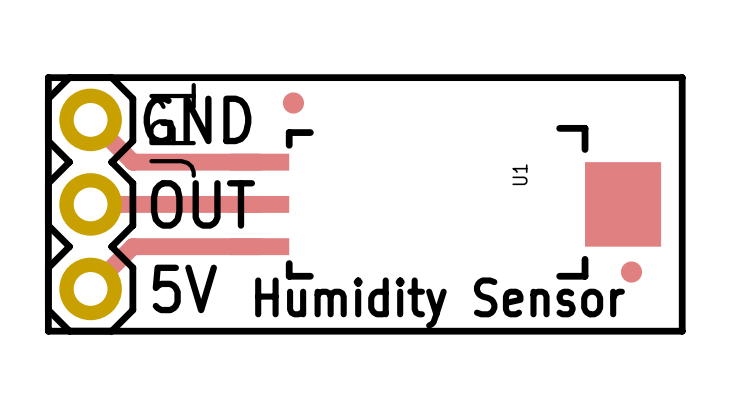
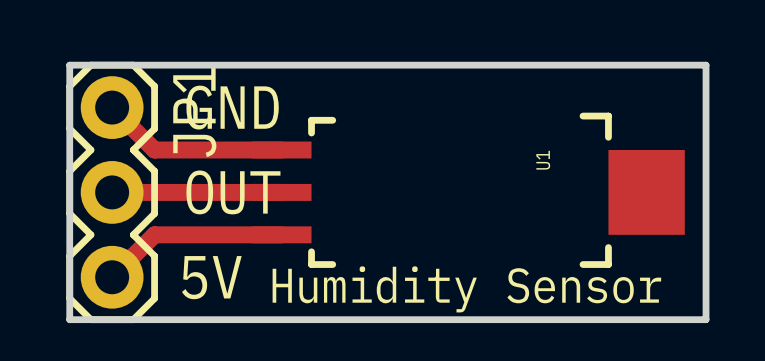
part: (293, 102) -> none
part: (631, 272) -> none

